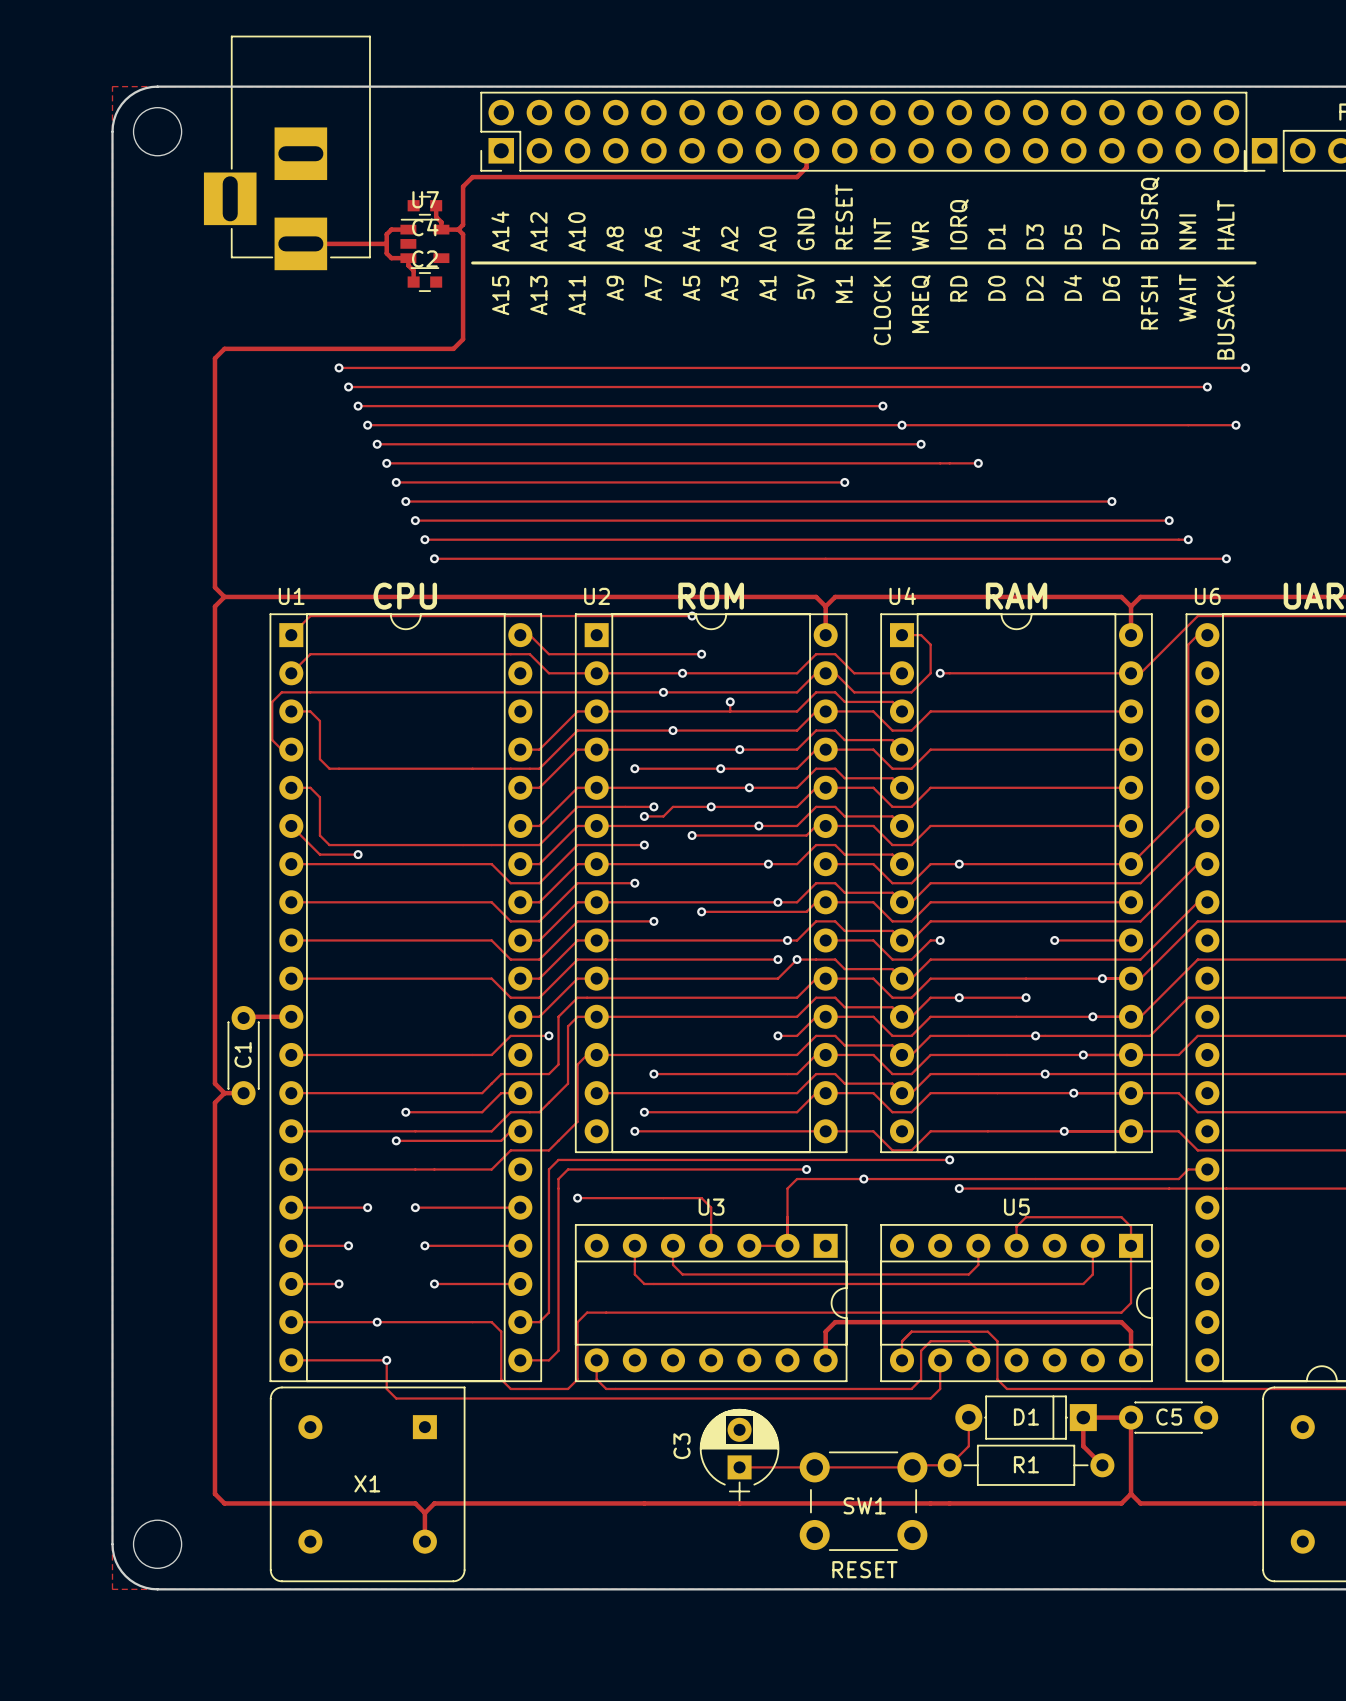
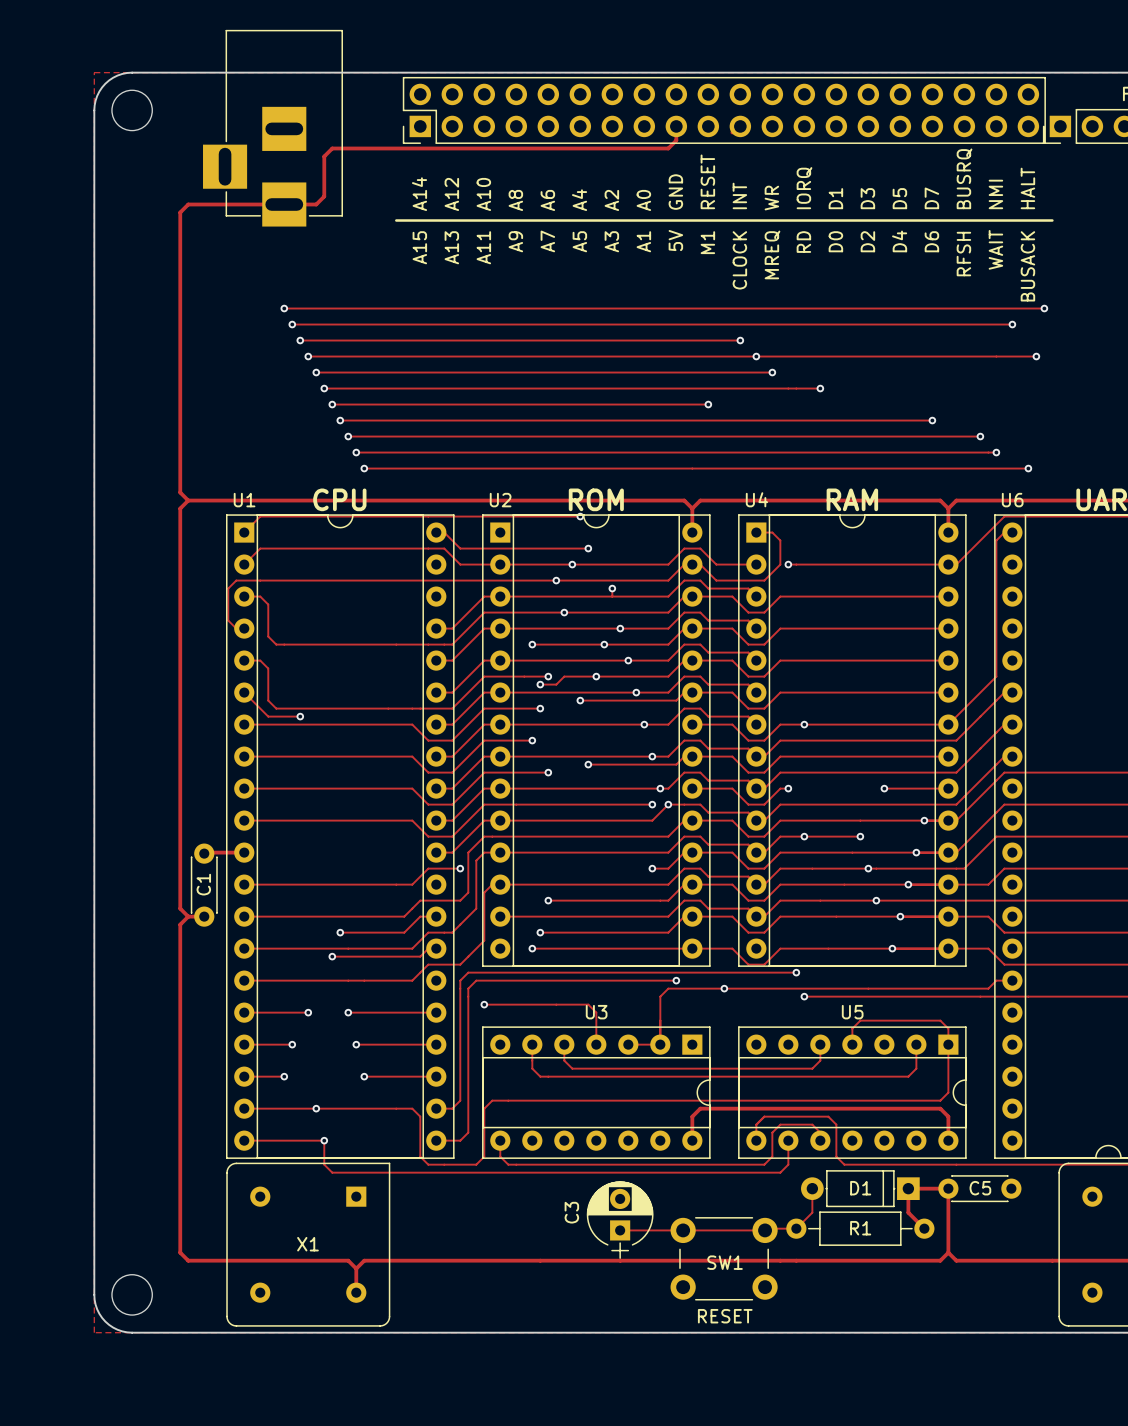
part position: (287, 152) -> (273, 128)
track: (472, 177) (463, 186) (463, 224) (458, 229) -> (396, 148) (332, 148) (324, 156) (324, 196) (316, 204)
C4: (424, 205) -> none
track: (436, 205) (436, 216) (441, 222) (441, 229) (458, 229) (463, 234) (463, 339) (453, 348) (224, 348) (214, 358) -> (252, 204) (188, 204) (180, 212) (180, 300)
track: (408, 229) (391, 229) (386, 234) (386, 253) (391, 258) (408, 258) (408, 265) (413, 270) (413, 282) -> none
track: (377, 243) (386, 243) -> none
U7: (424, 243) -> none
C2: (424, 282) -> none

